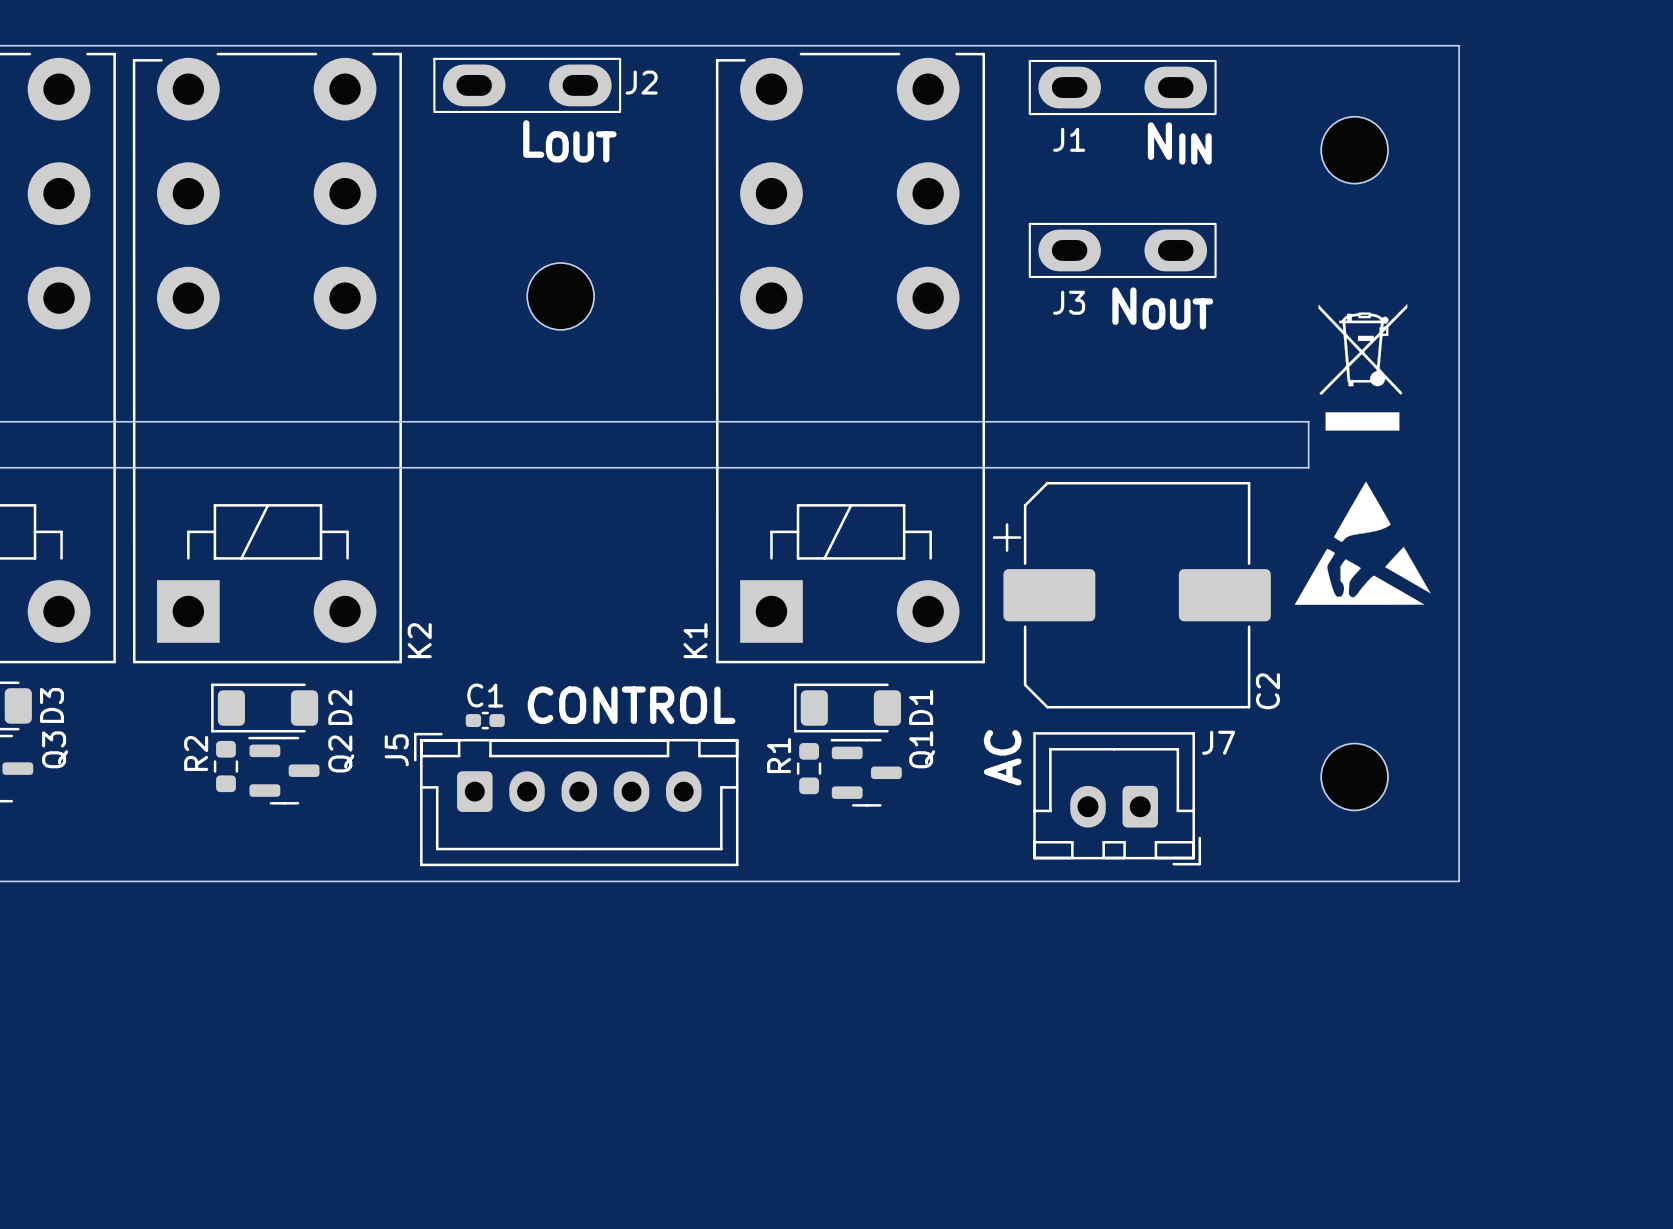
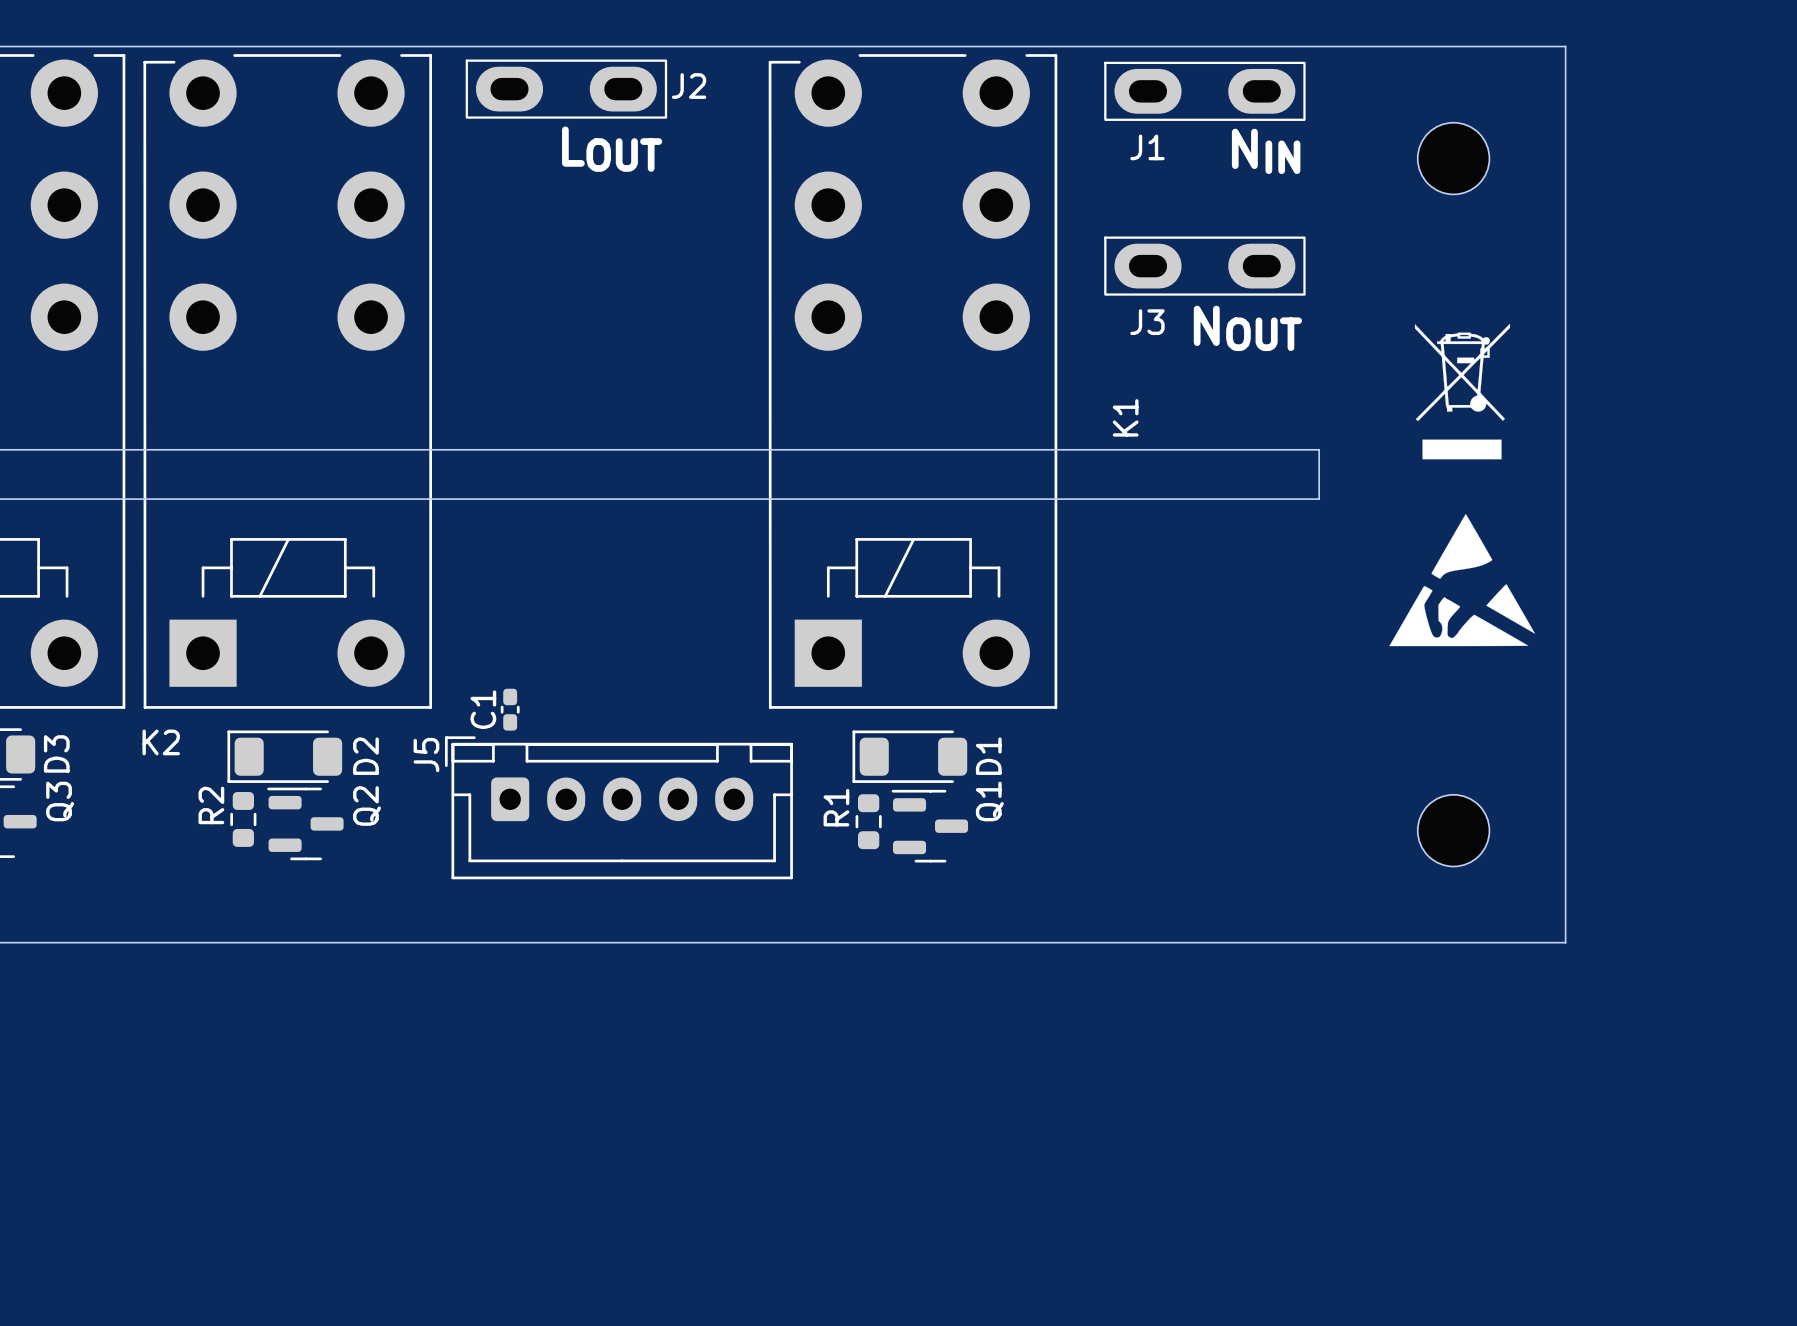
part: (560, 296) -> none
board edge: (1229, 421) (1308, 421) (1308, 467) (1229, 467) -> (1319, 449) (1319, 499)
C2: (1131, 595) -> none
K2 name rotation: 0° (419, 640) -> 90° clockwise (161, 742)
K2 name position: K2 (419, 640) -> K2 (161, 742)
K1 name position: K1 (695, 640) -> K1 (1125, 417)
text: CONTROL (631, 705) -> none
C1 rotation: 0° (485, 720) -> 90° clockwise (510, 709)
C1 position: (485, 720) -> (510, 709)
text: AC (1002, 757) -> none
J7: (1117, 798) -> none
J5 position: (576, 799) -> (618, 807)

